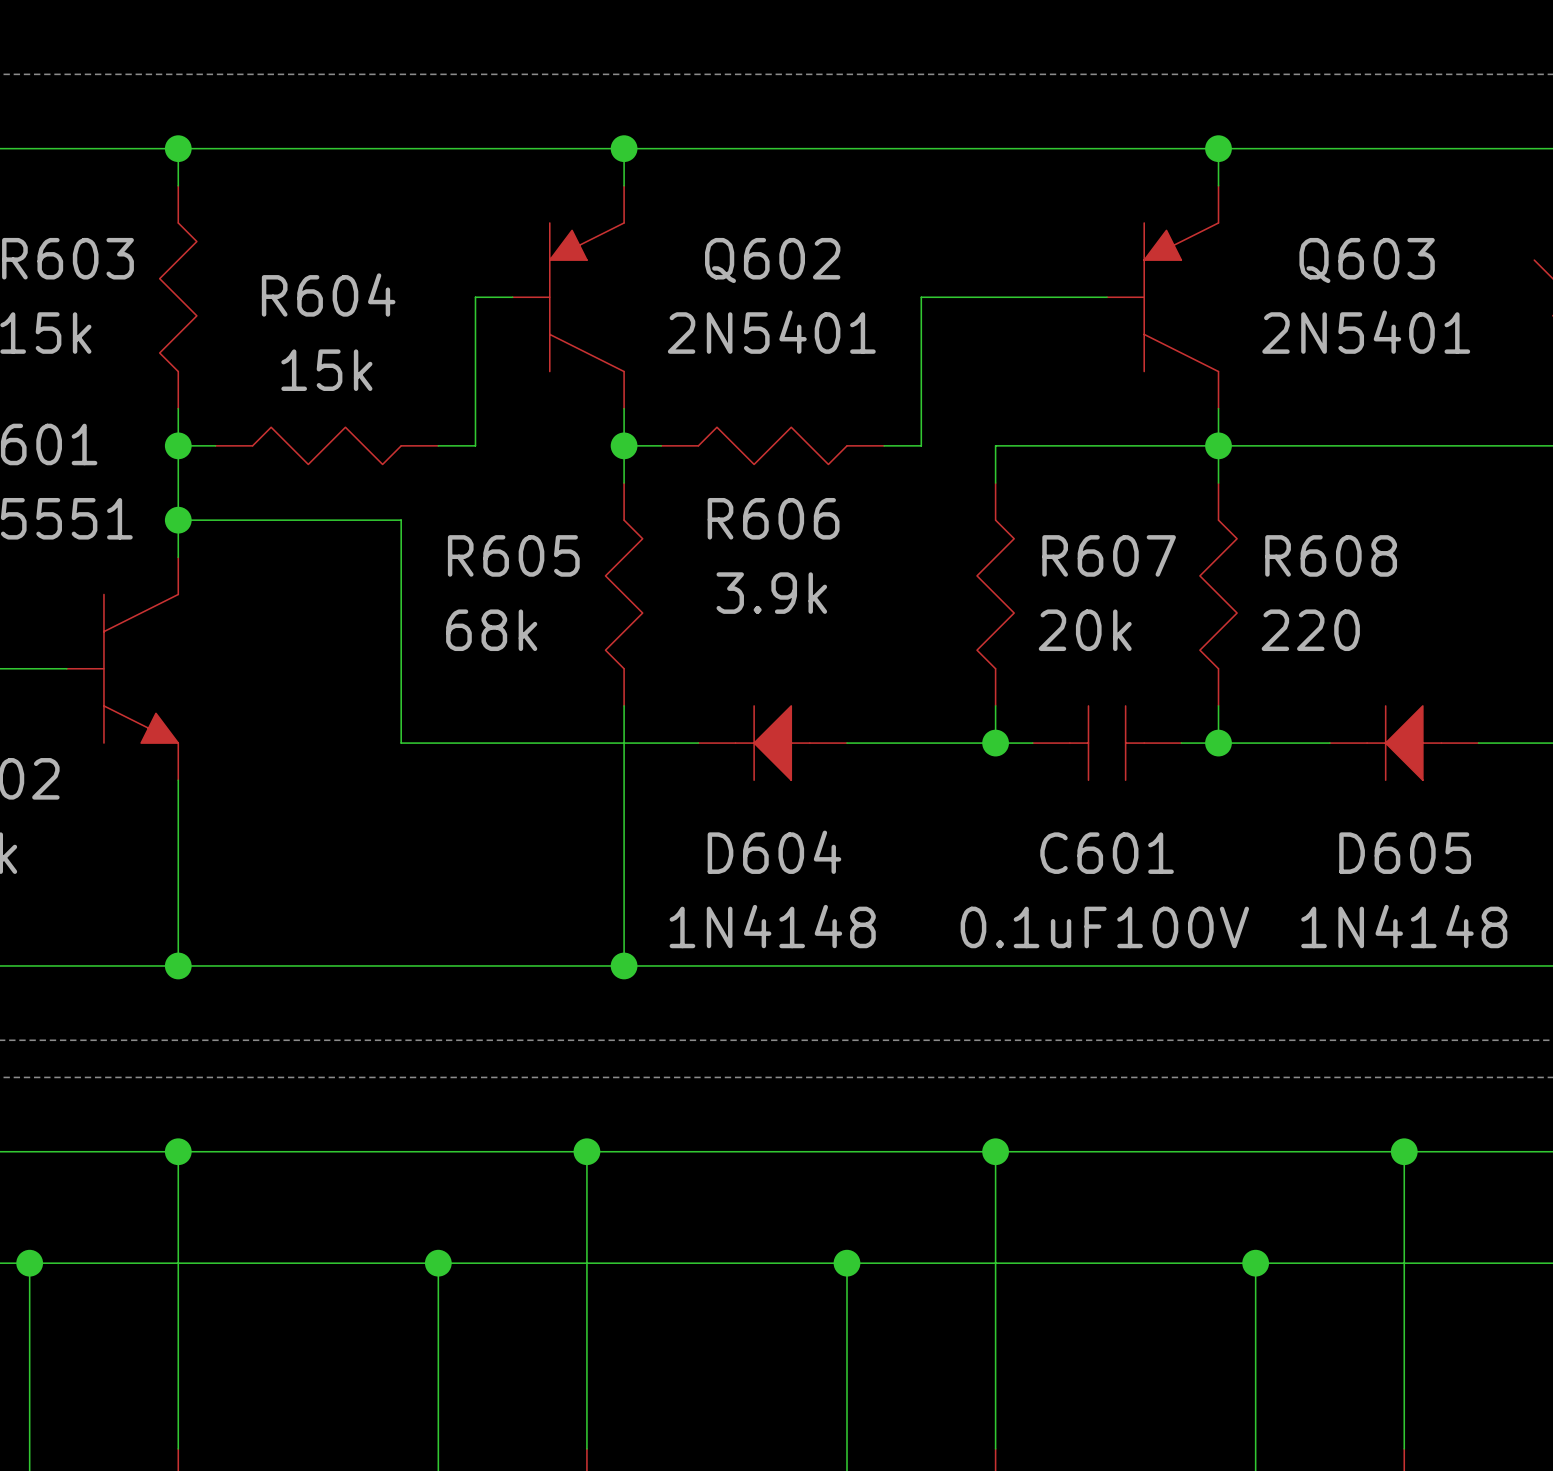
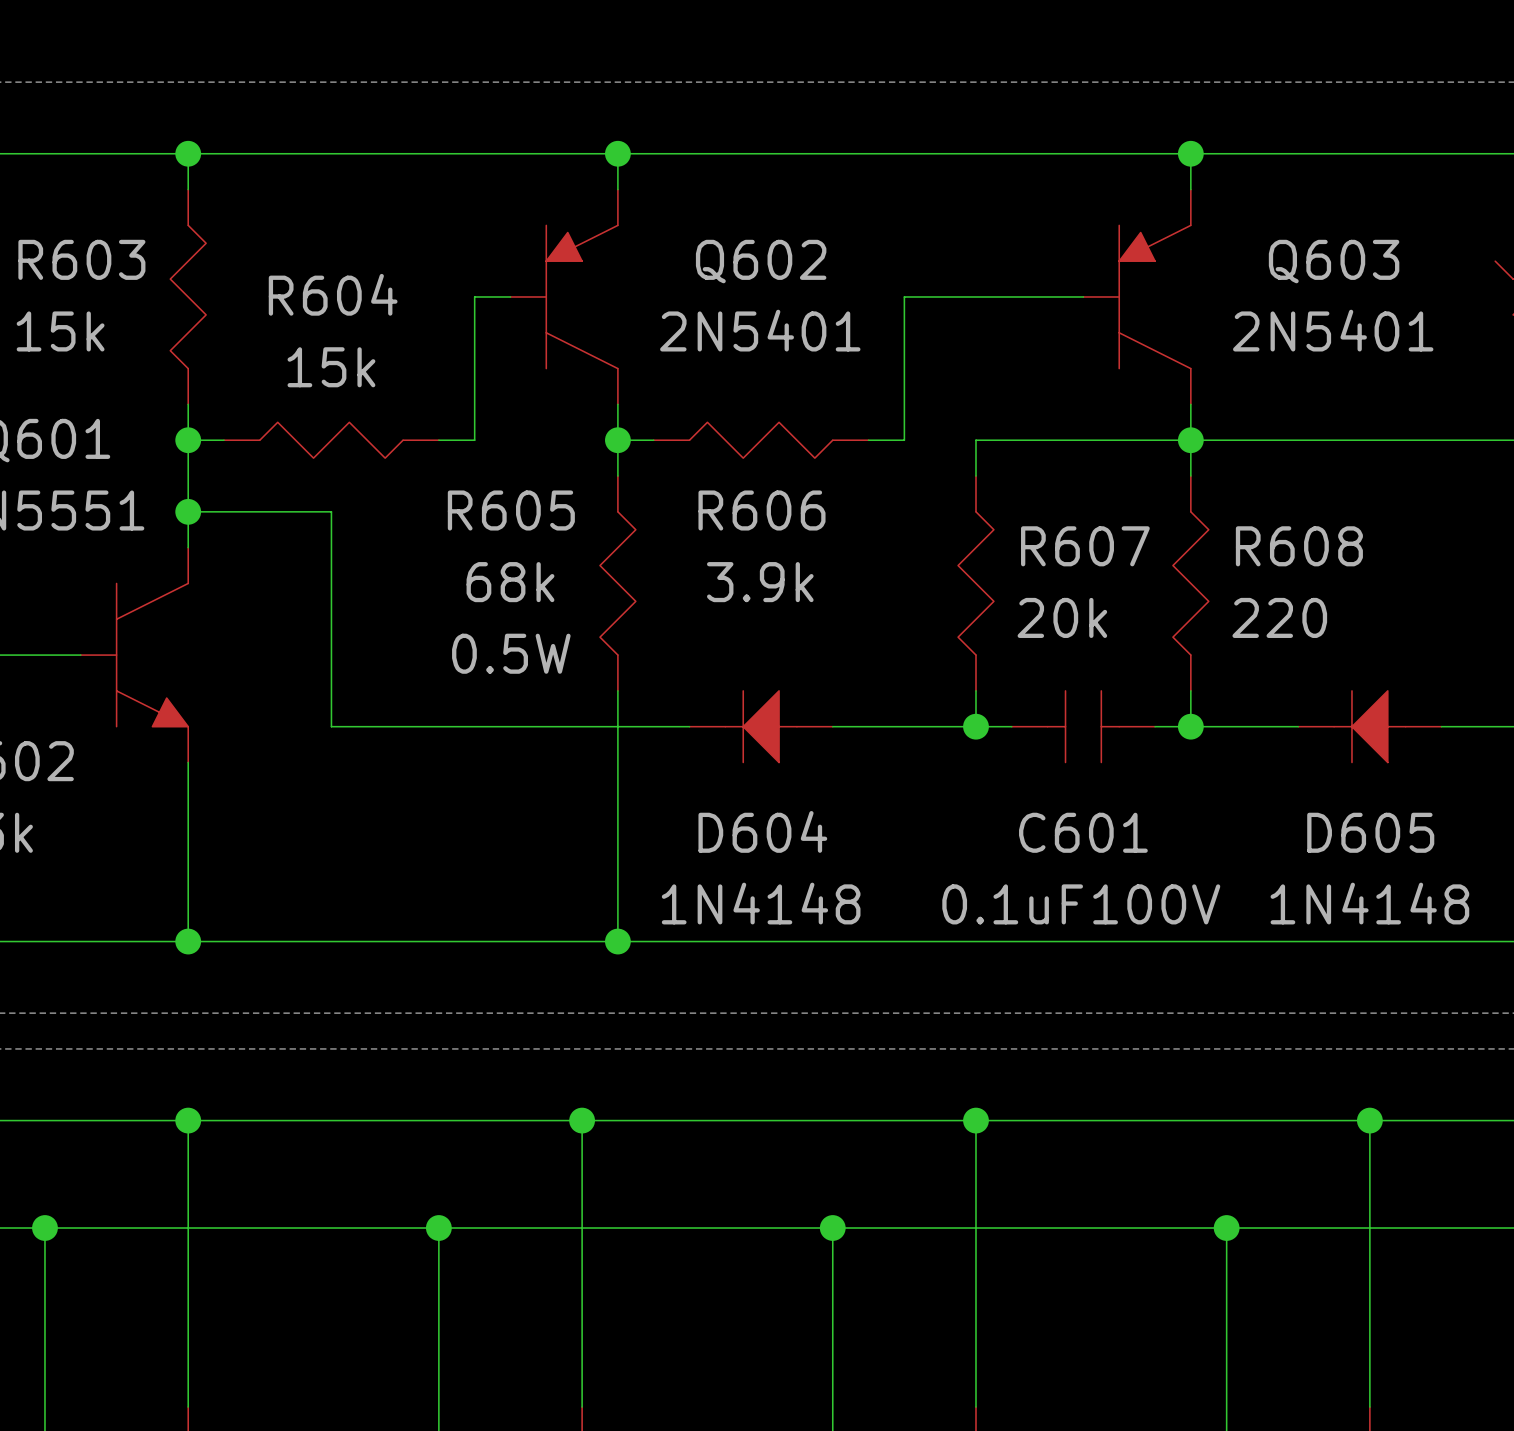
wire: (326, 520) (401, 520) (401, 743) -> (331, 511) (331, 726) (403, 726)
R605 name position: R605 (513, 555) -> R605 (511, 510)
R605 value position: 68k (491, 630) -> 68k (510, 582)
R605 text: none -> 0.5W (511, 653)

